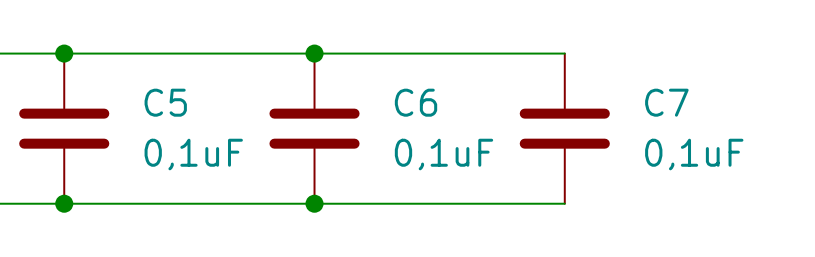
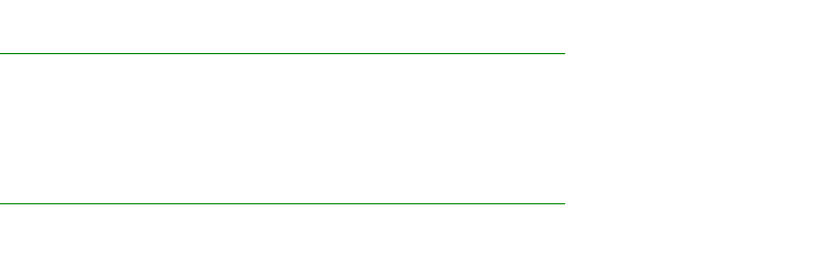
junction: (64, 53) -> none
junction: (314, 53) -> none
C5: 0,1uF (64, 128) -> none
C6: 0,1uF (314, 128) -> none
C7: 0,1uF (564, 128) -> none
junction: (64, 203) -> none
junction: (314, 203) -> none

